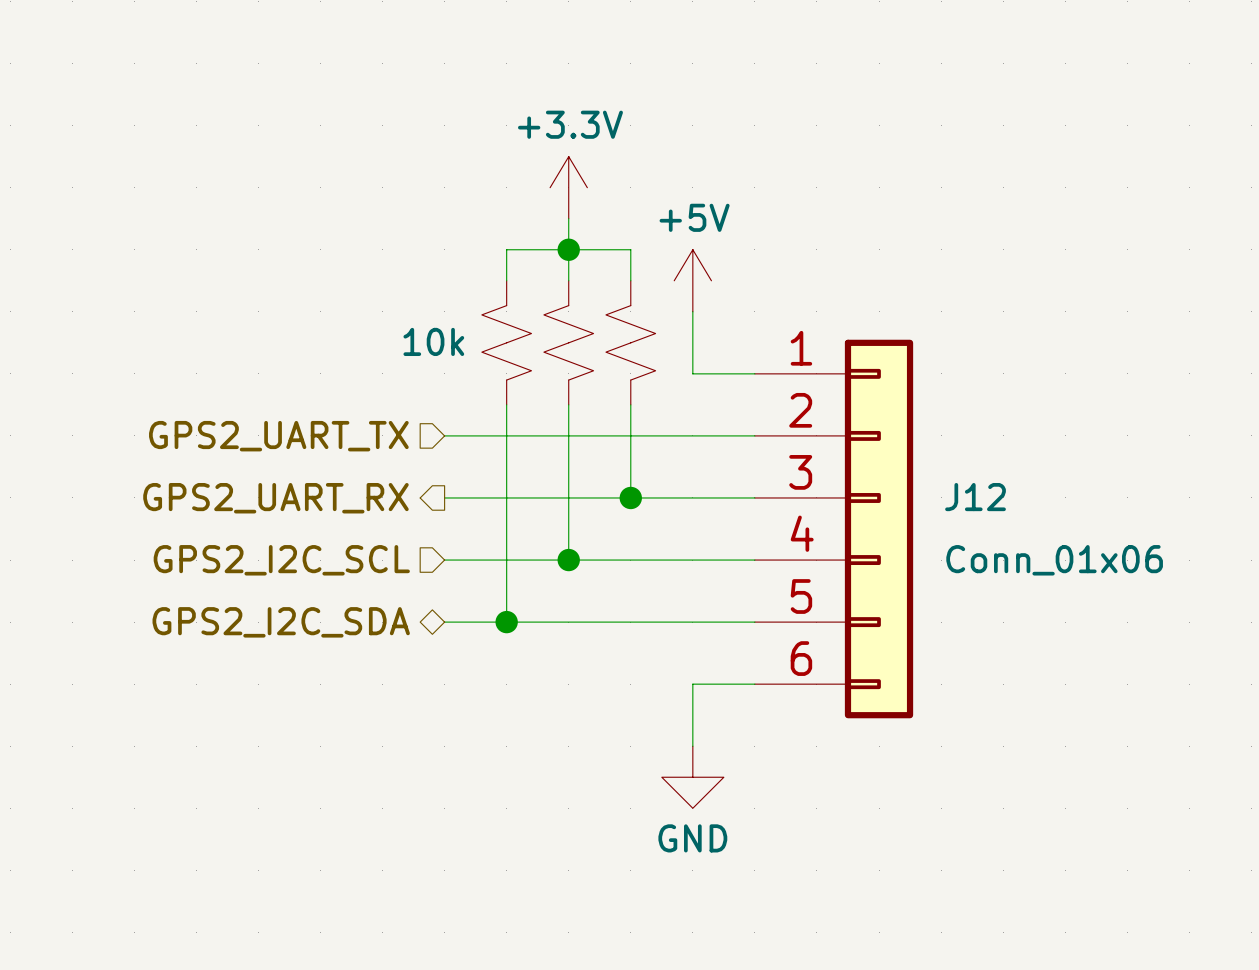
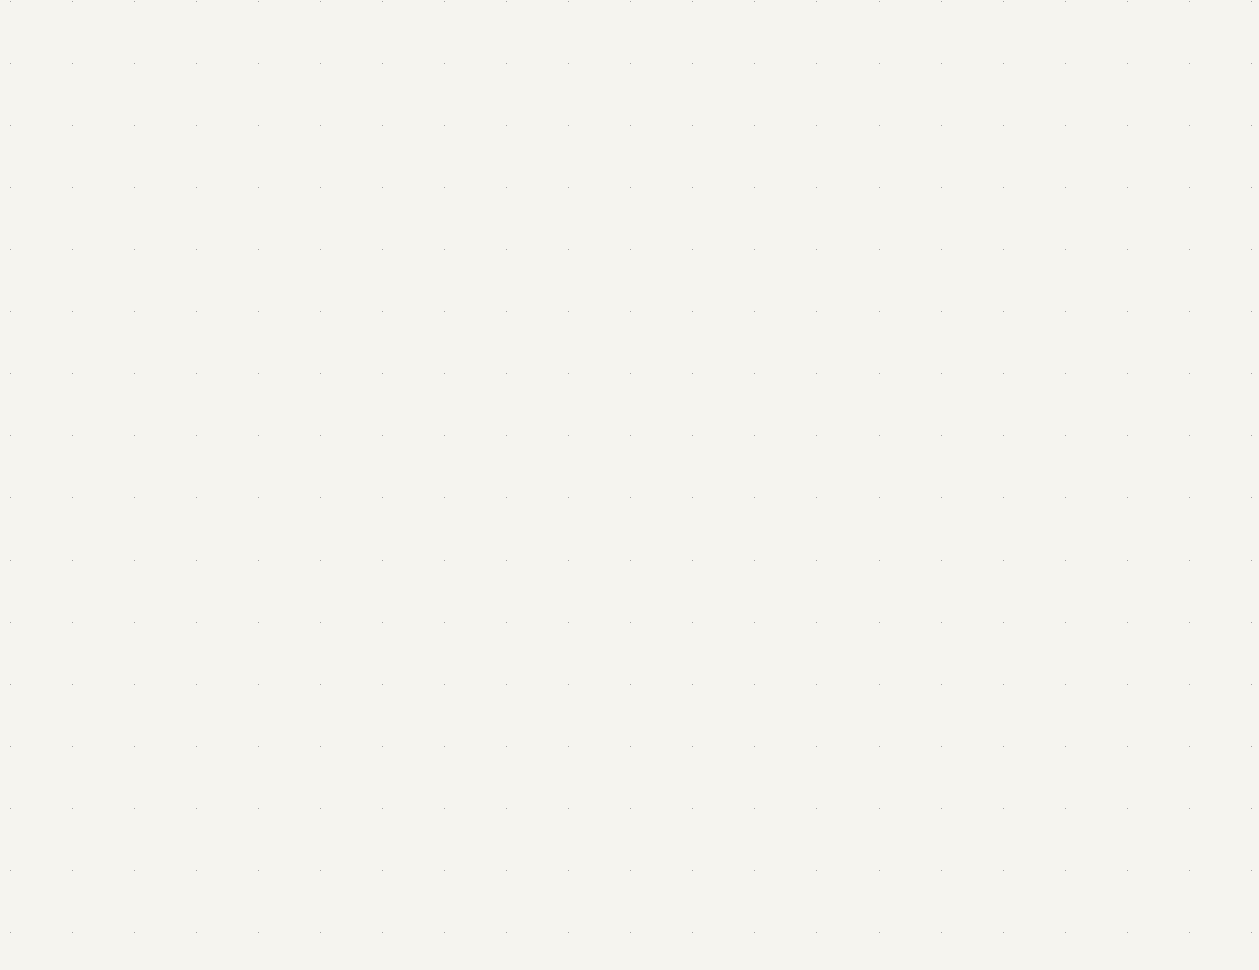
power symbol: +3.3V (568, 187) -> none
wire: (568, 218) (568, 280) -> none
junction: (568, 249) -> none
wire: (506, 280) (506, 249) (630, 249) (630, 280) -> none
power symbol: +5V (692, 280) -> none
wire: (692, 311) (692, 373) (754, 373) -> none
part: (506, 342) -> none
part: (568, 342) -> none
part: 10k (630, 342) -> none
wire: (506, 404) (506, 622) -> none
wire: (568, 404) (568, 560) -> none
wire: (630, 404) (630, 497) -> none
wire: (444, 435) (754, 435) -> none
hierarchical label: GPS2_UART_TX (278, 436) -> none
wire: (444, 497) (754, 497) -> none
junction: (630, 497) -> none
hierarchical label: GPS2_UART_RX (275, 498) -> none
J12: Conn_01x06 (834, 529) -> none
hierarchical label: GPS2_I2C_SCL (281, 560) -> none
wire: (444, 560) (754, 560) -> none
junction: (568, 560) -> none
hierarchical label: GPS2_I2C_SDA (281, 622) -> none
wire: (444, 622) (754, 622) -> none
junction: (506, 622) -> none
wire: (754, 684) (692, 684) (692, 746) -> none
power symbol: GND (692, 777) -> none

